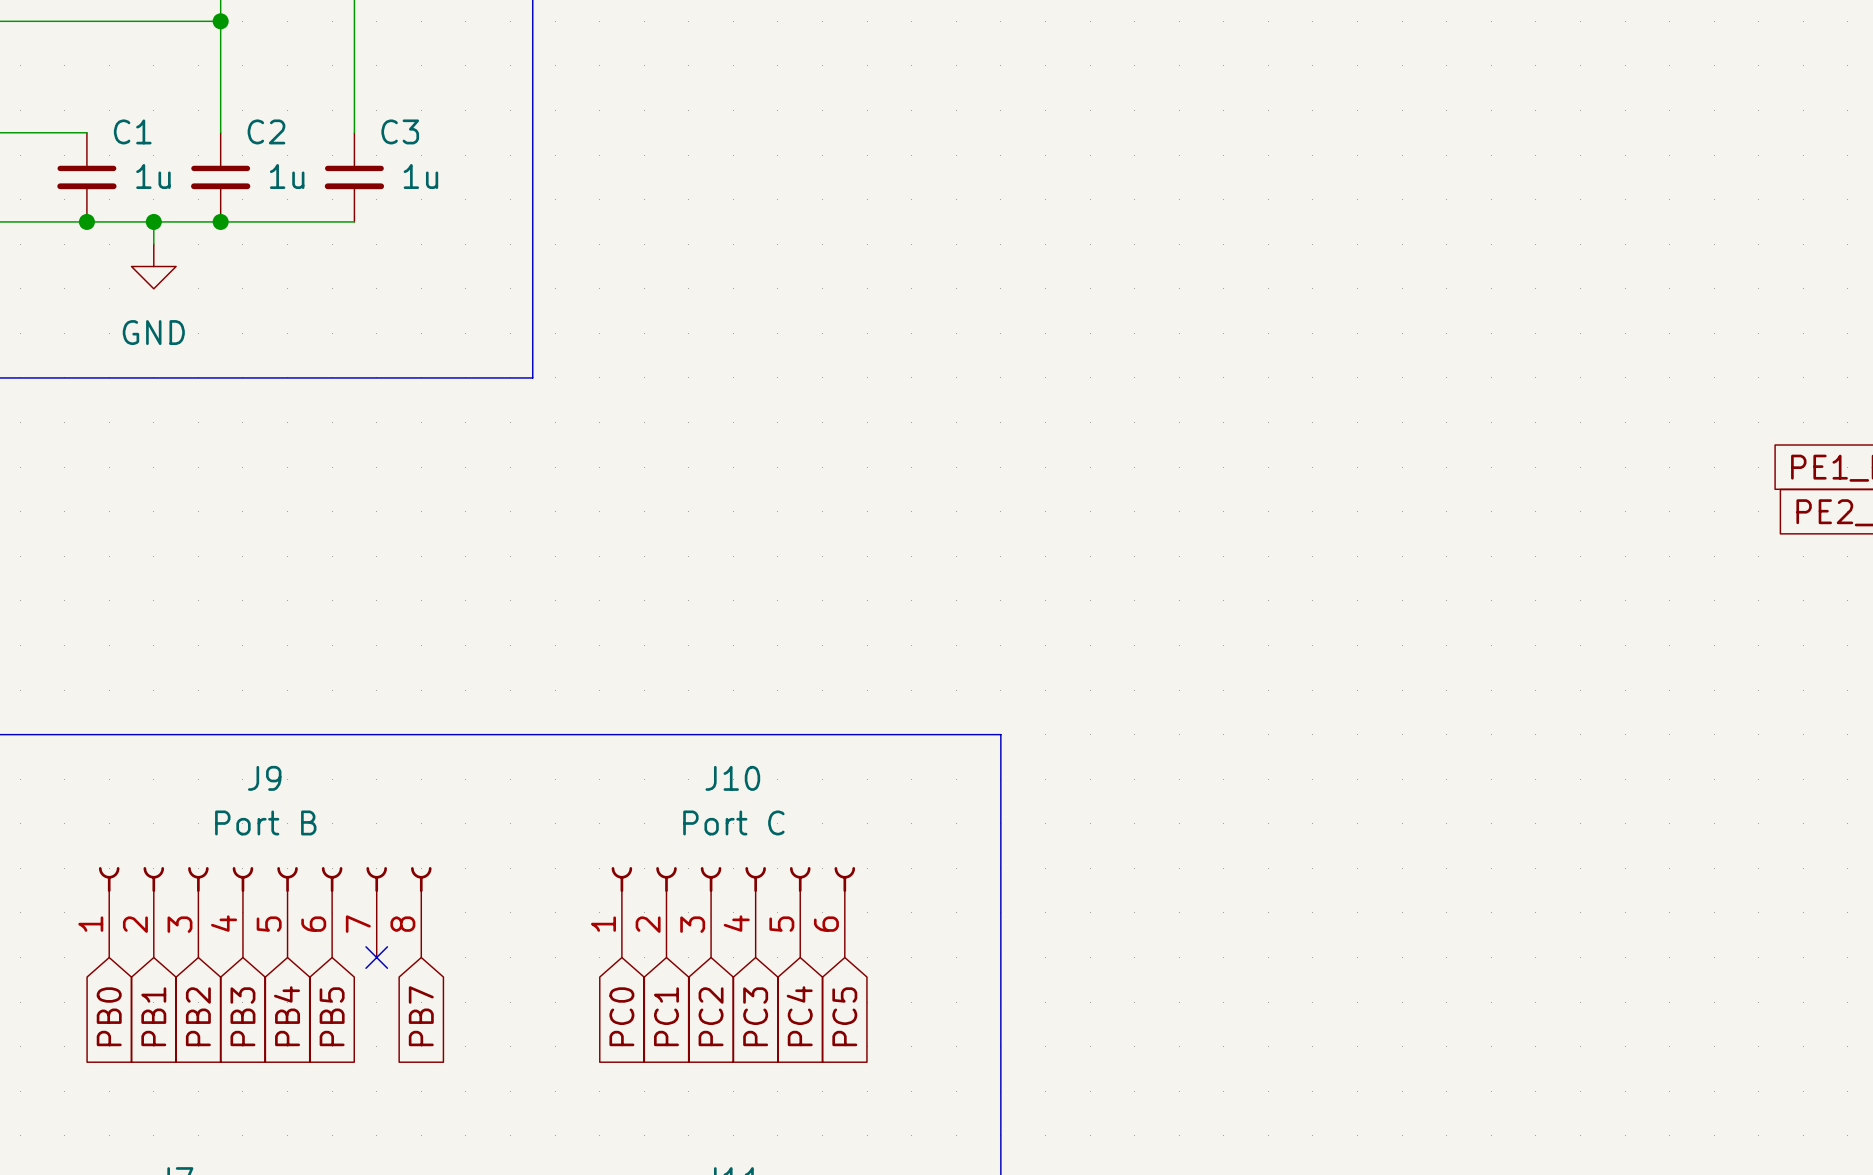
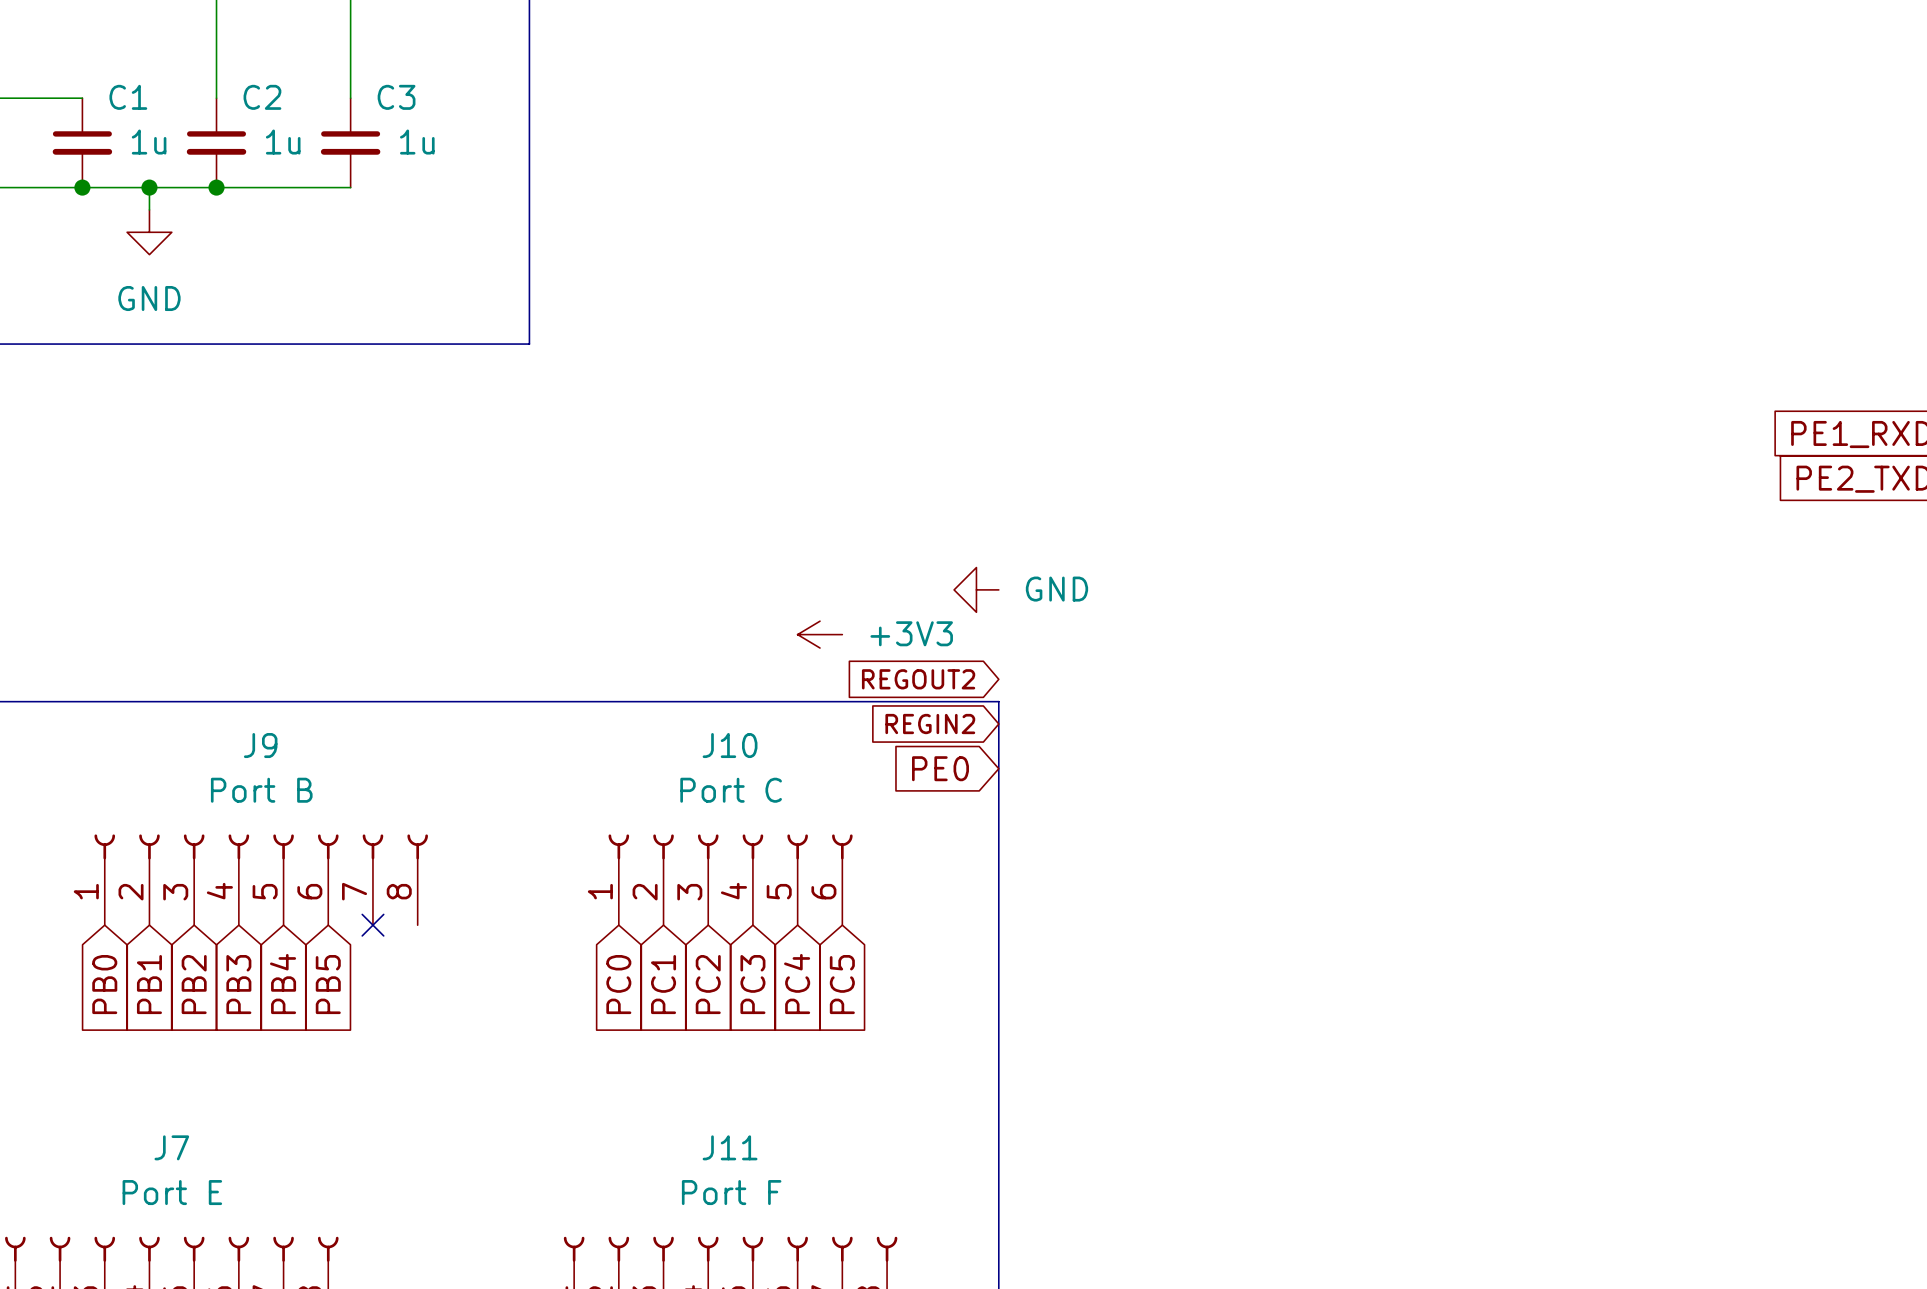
power symbol: none -> GND (976, 589)
power symbol: none -> +3V3 (819, 634)
global label: none -> REGOUT2 (918, 679)
global label: none -> REGIN2 (930, 724)
global label: none -> PE0 (940, 768)
global label: PB7 (421, 1016) -> none

